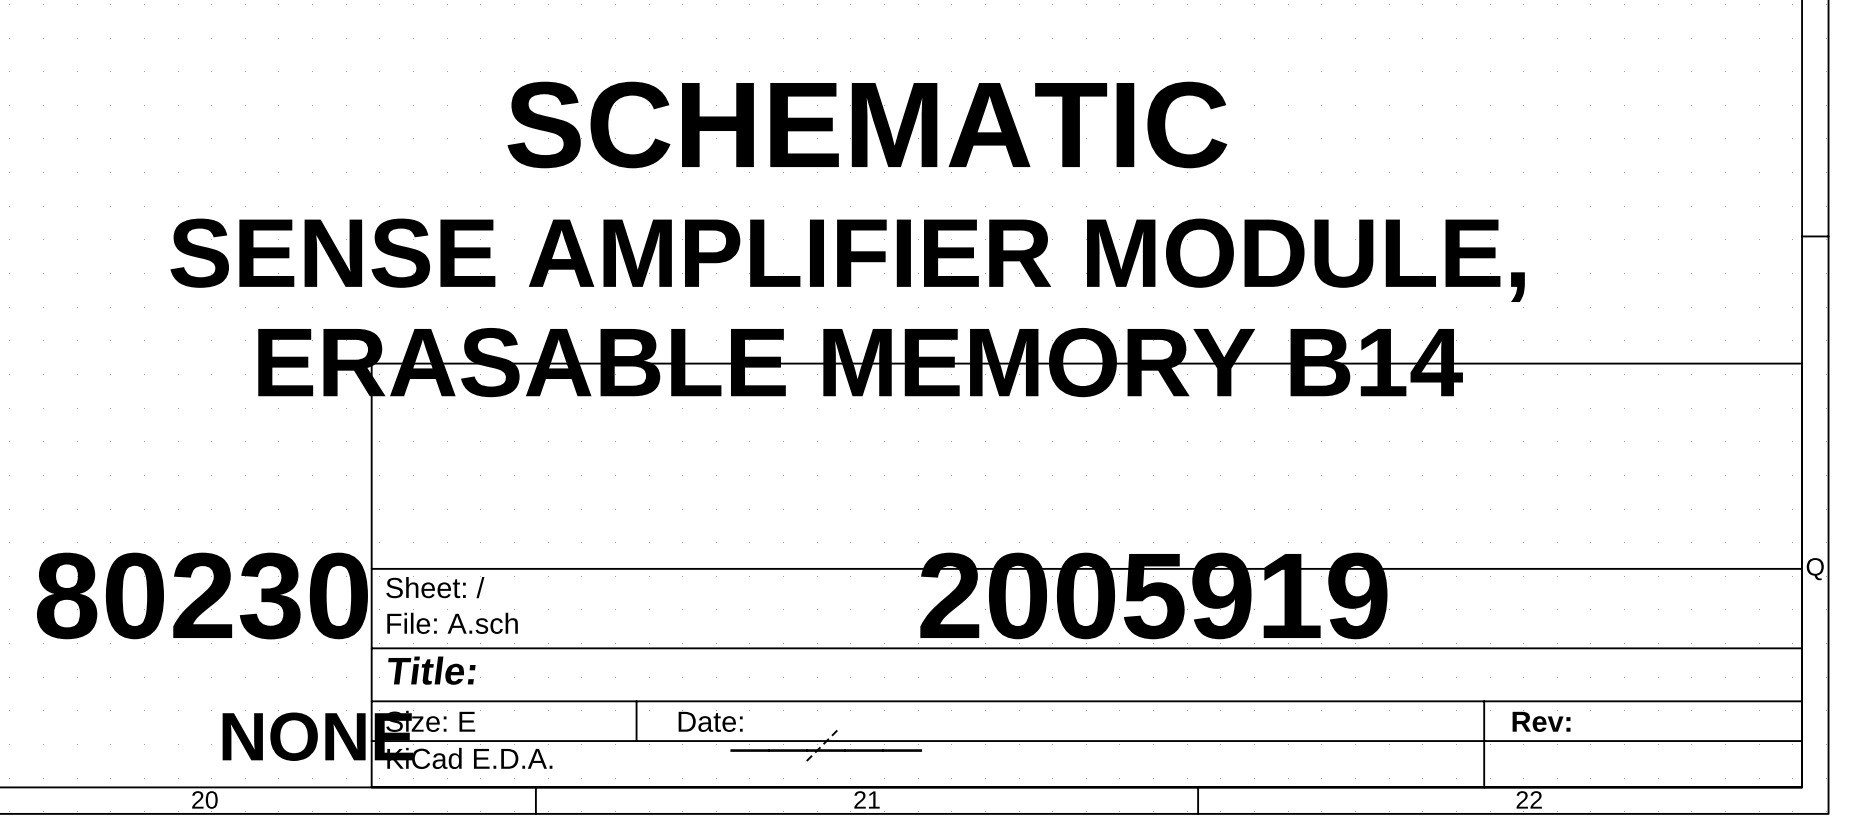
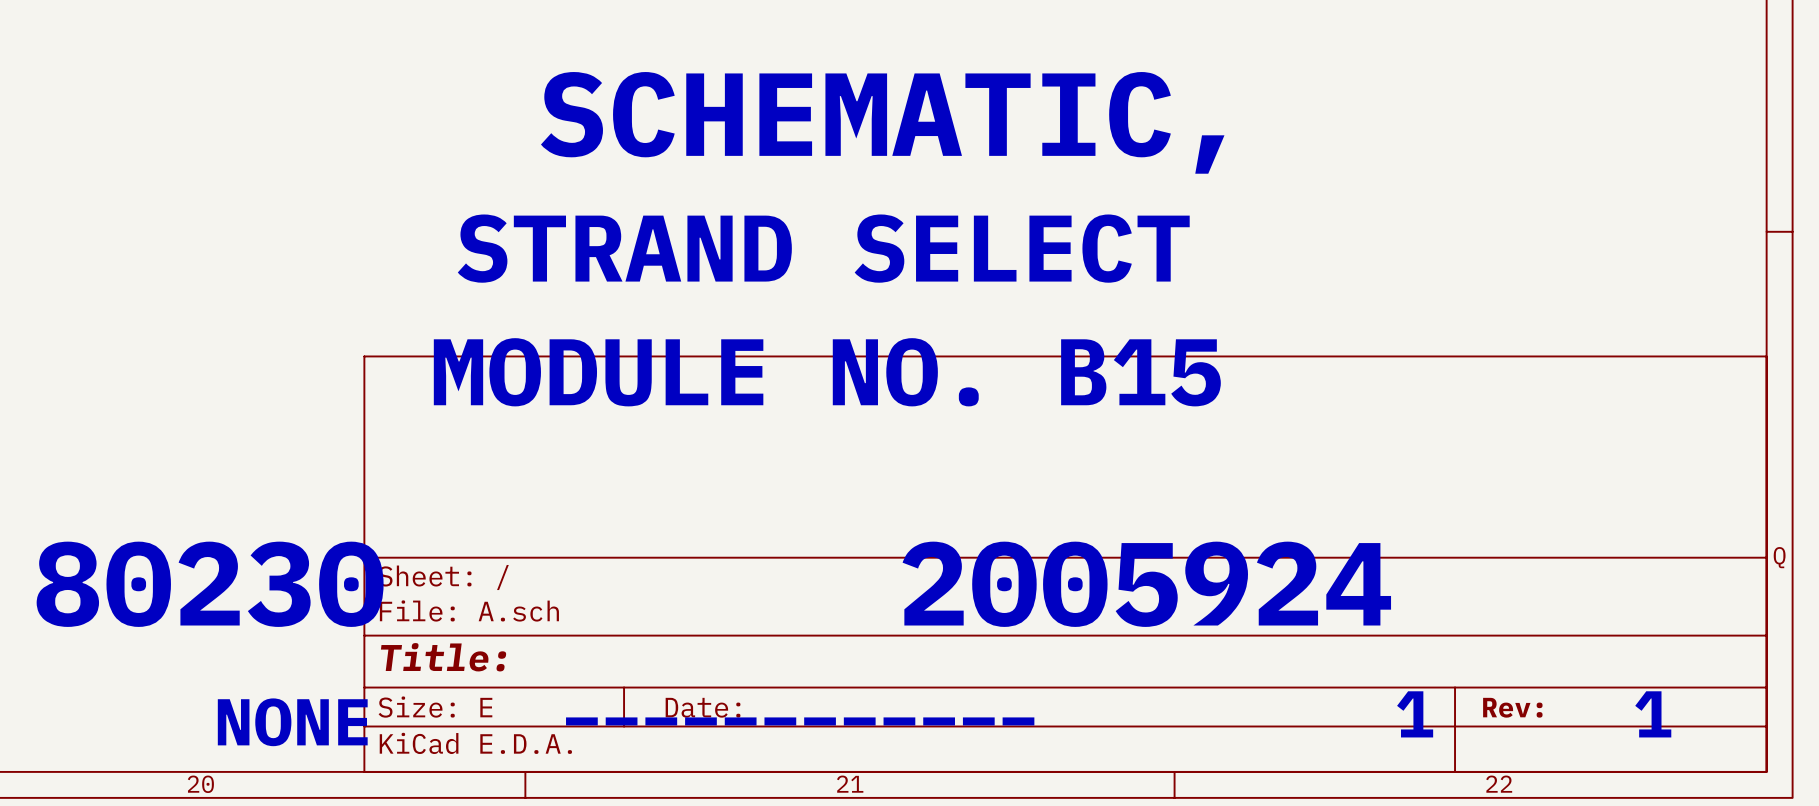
text: SCHEMATIC (867, 125) -> SCHEMATIC, (882, 122)
text: none -> STRAND SELECT (823, 248)
text: SENSE AMPLIFIER MODULE, (847, 260) -> none
text: ERASABLE MEMORY B14 (860, 362) -> none
text: none -> MODULE NO. B15 (827, 372)
text: 2005919 (1153, 595) -> 2005924 (1146, 584)
line: (840, 727) (806, 760) -> none
text: none -> 1 1 (1534, 714)
text: none -> ____________ (800, 721)
text: _____ (826, 750) -> none

